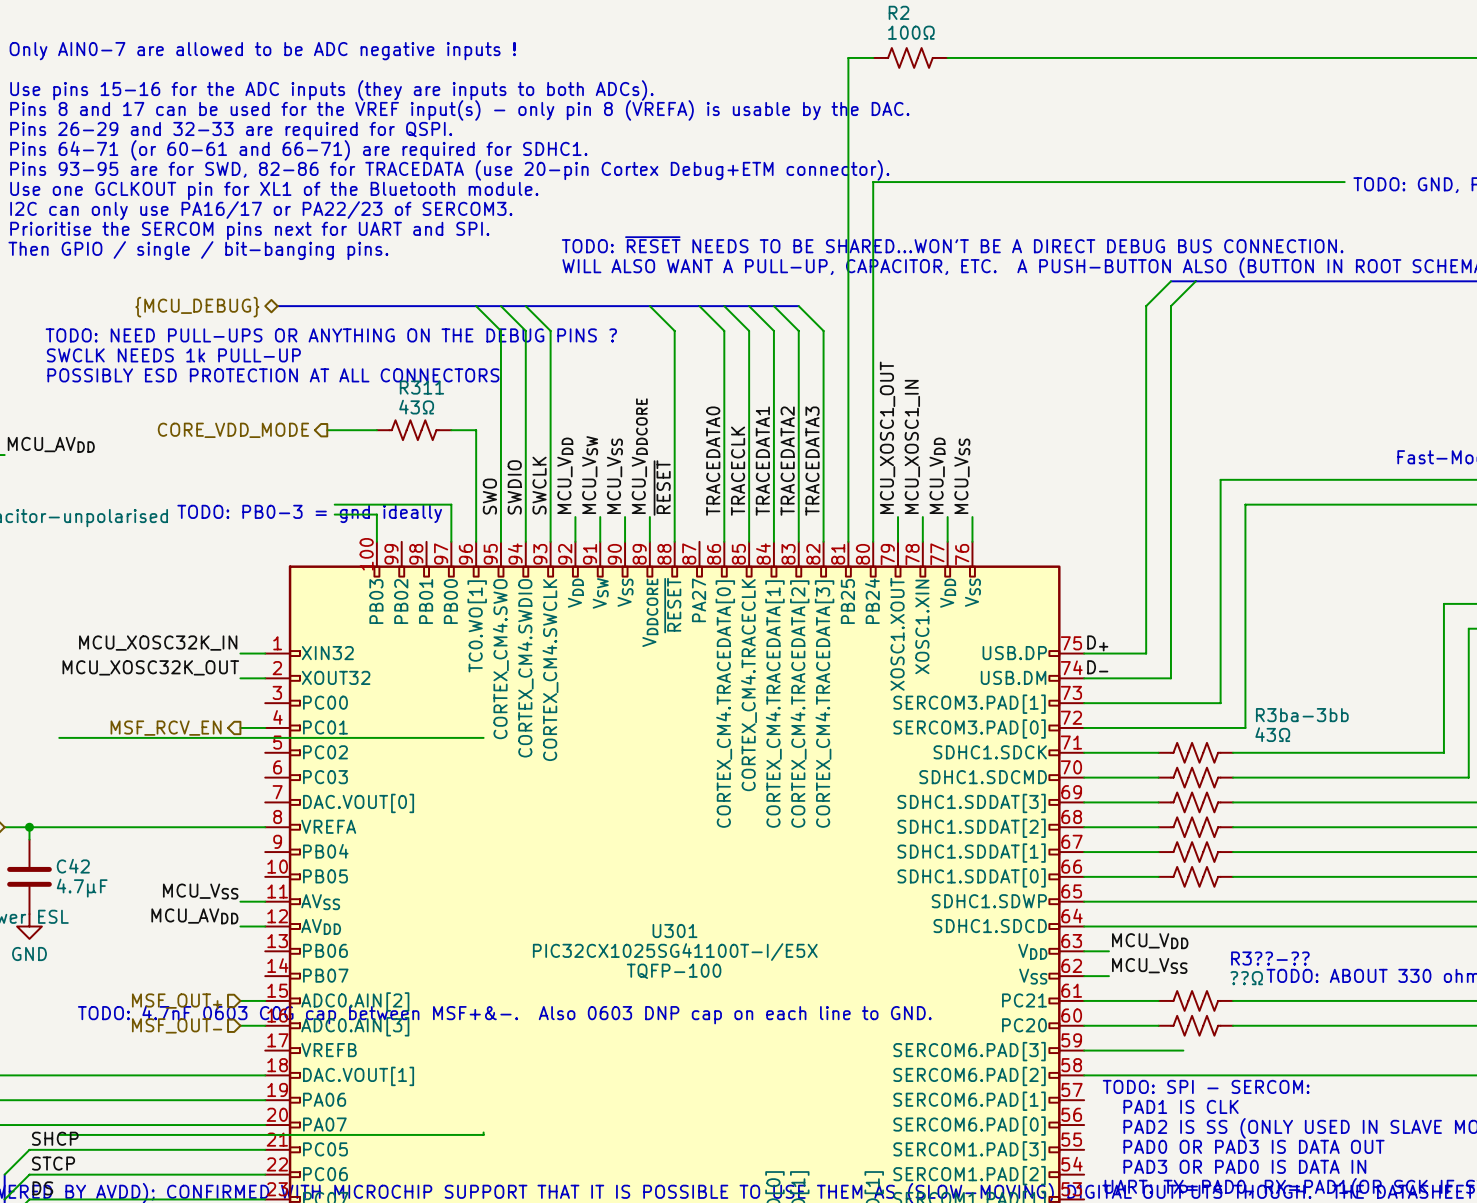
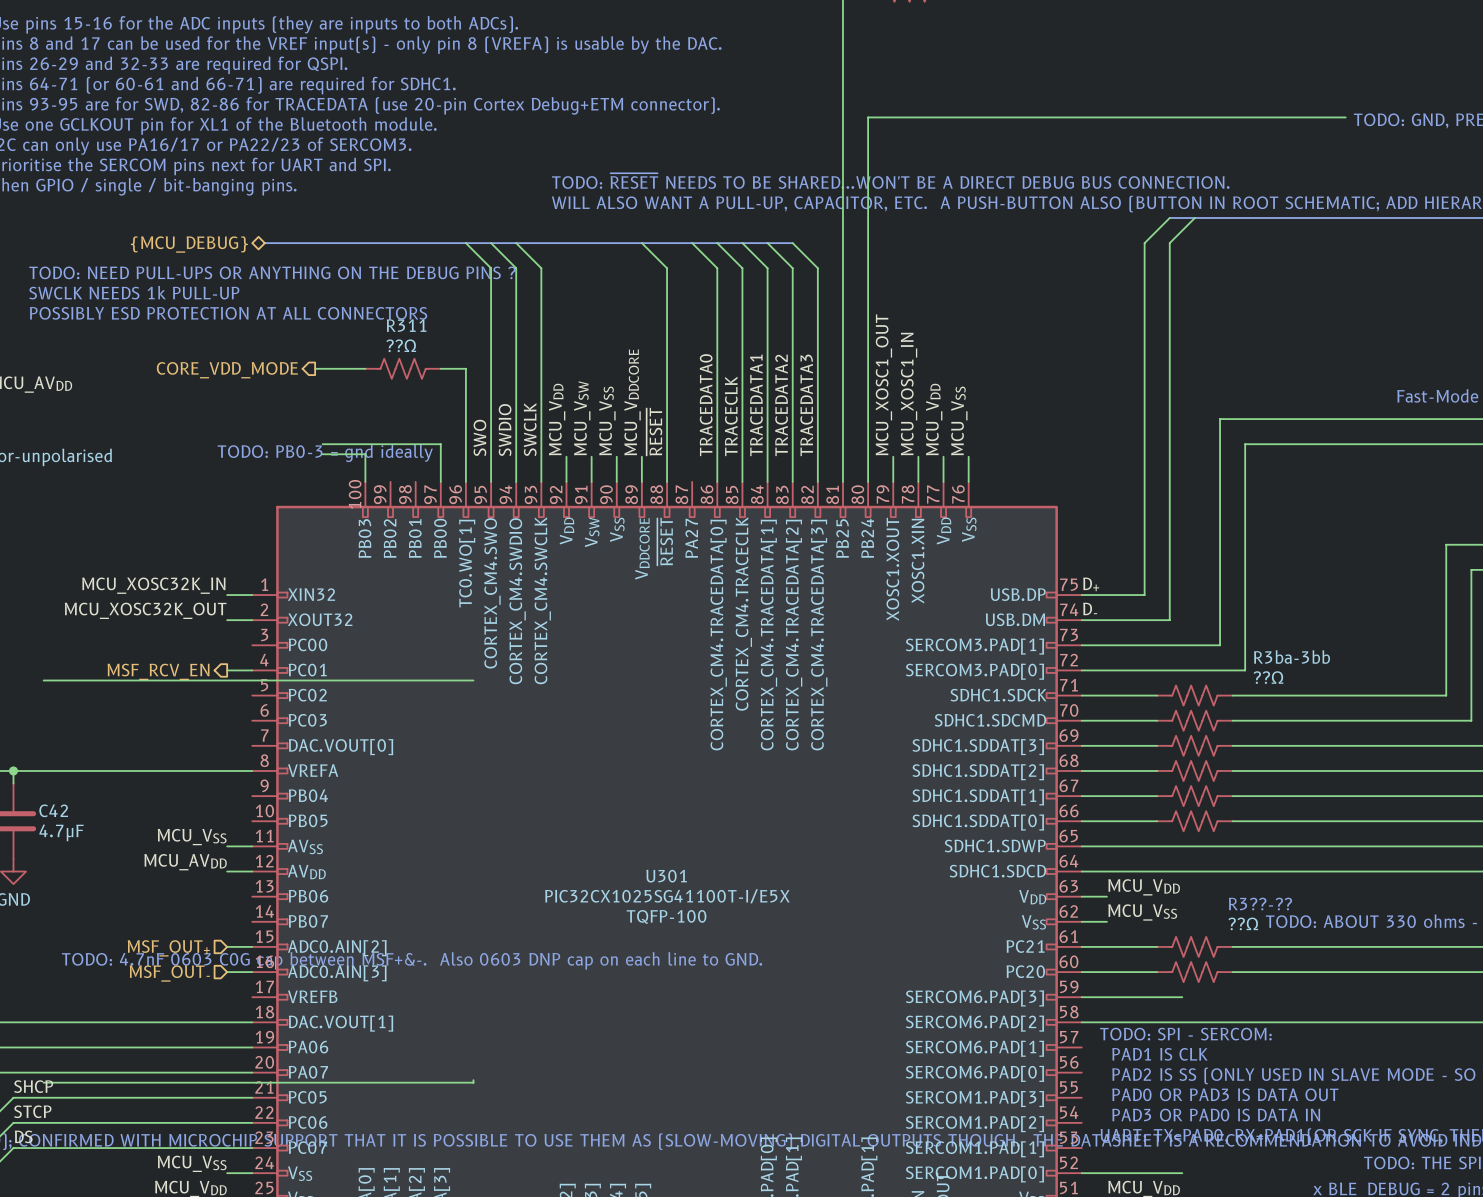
R311 value: 43Ω (416, 407) -> ??Ω (401, 345)
R3ba-3bb value: 43Ω (1272, 734) -> ??Ω (1268, 677)

